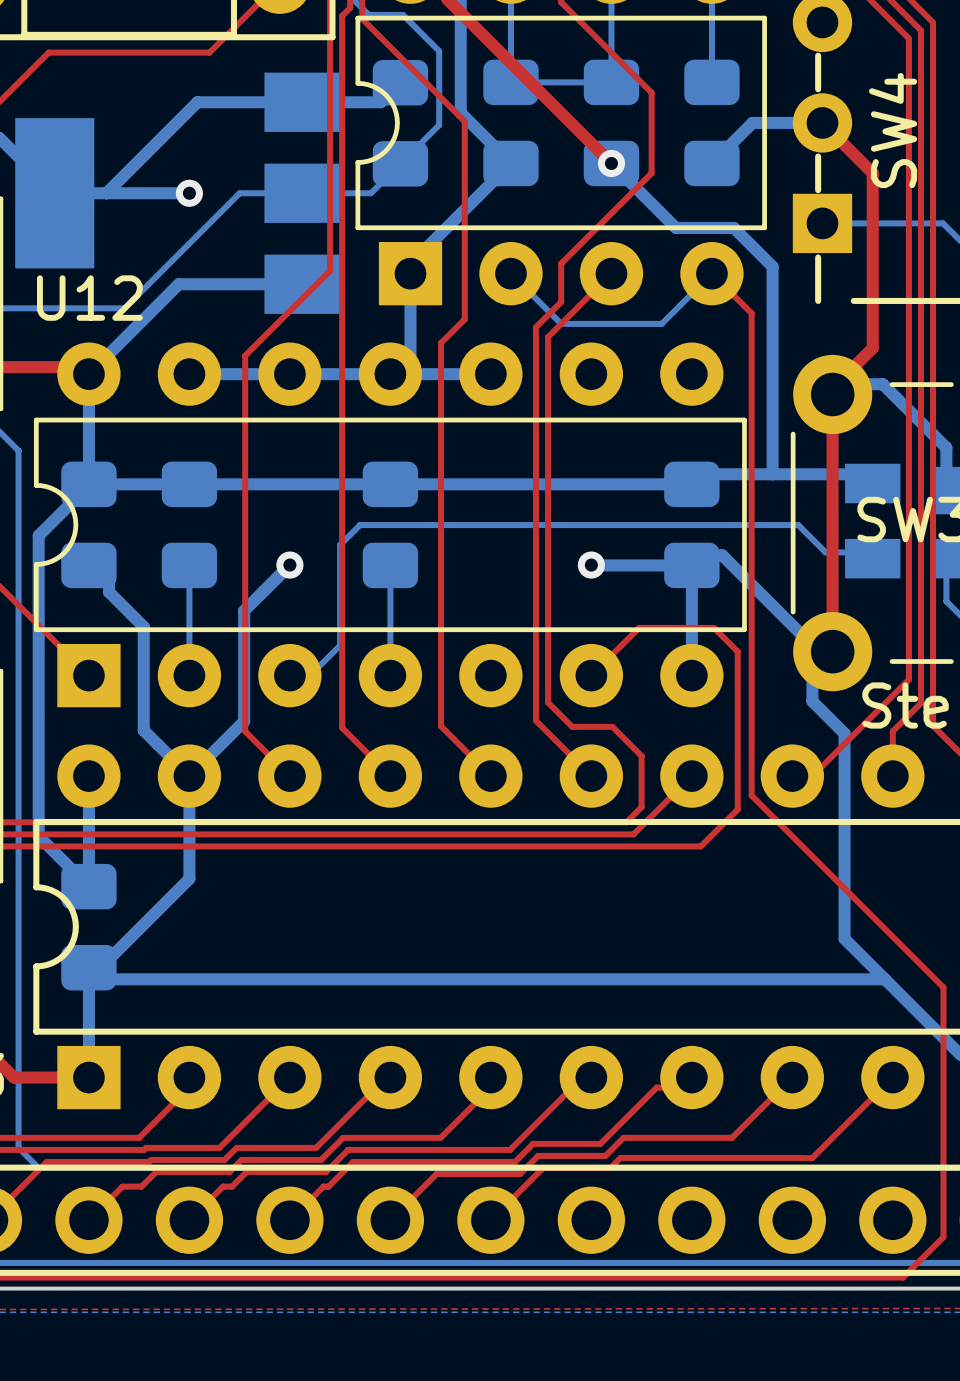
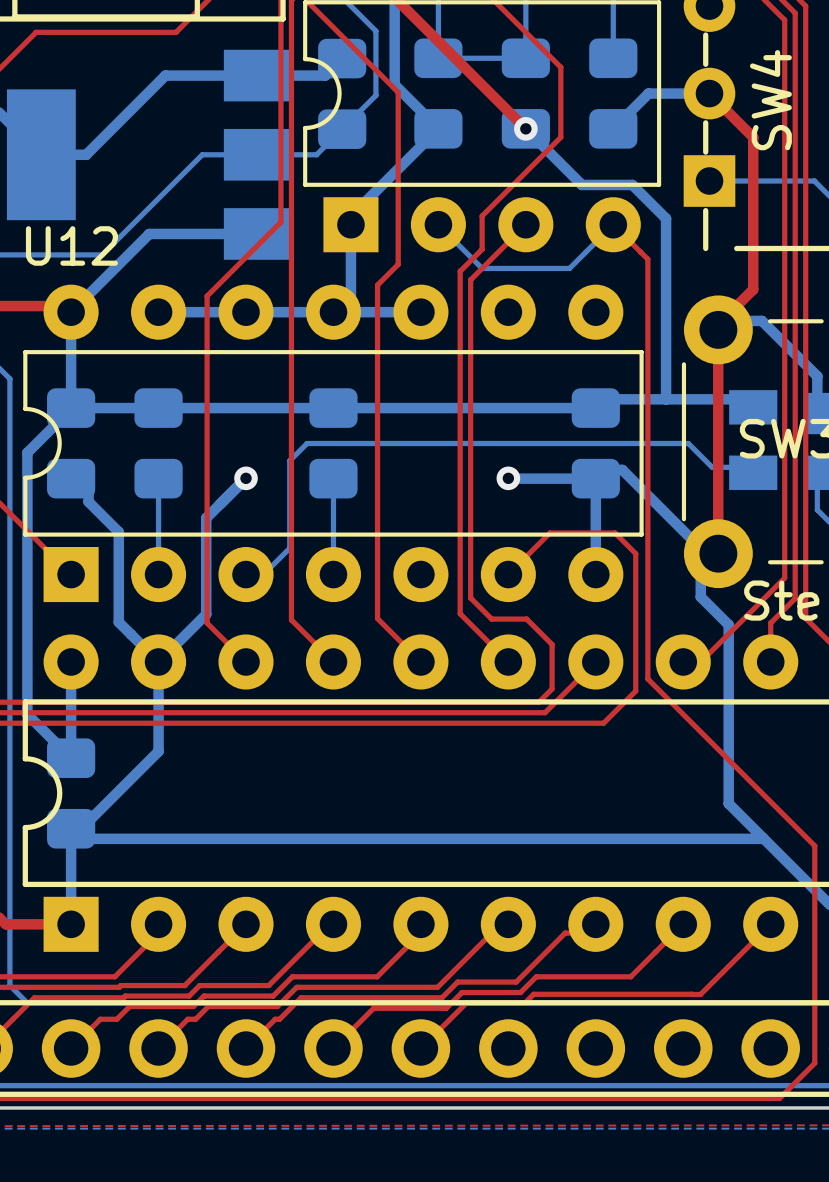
bottom track: (106, 193) (189, 193) -> none
via: (189, 193) -> none

